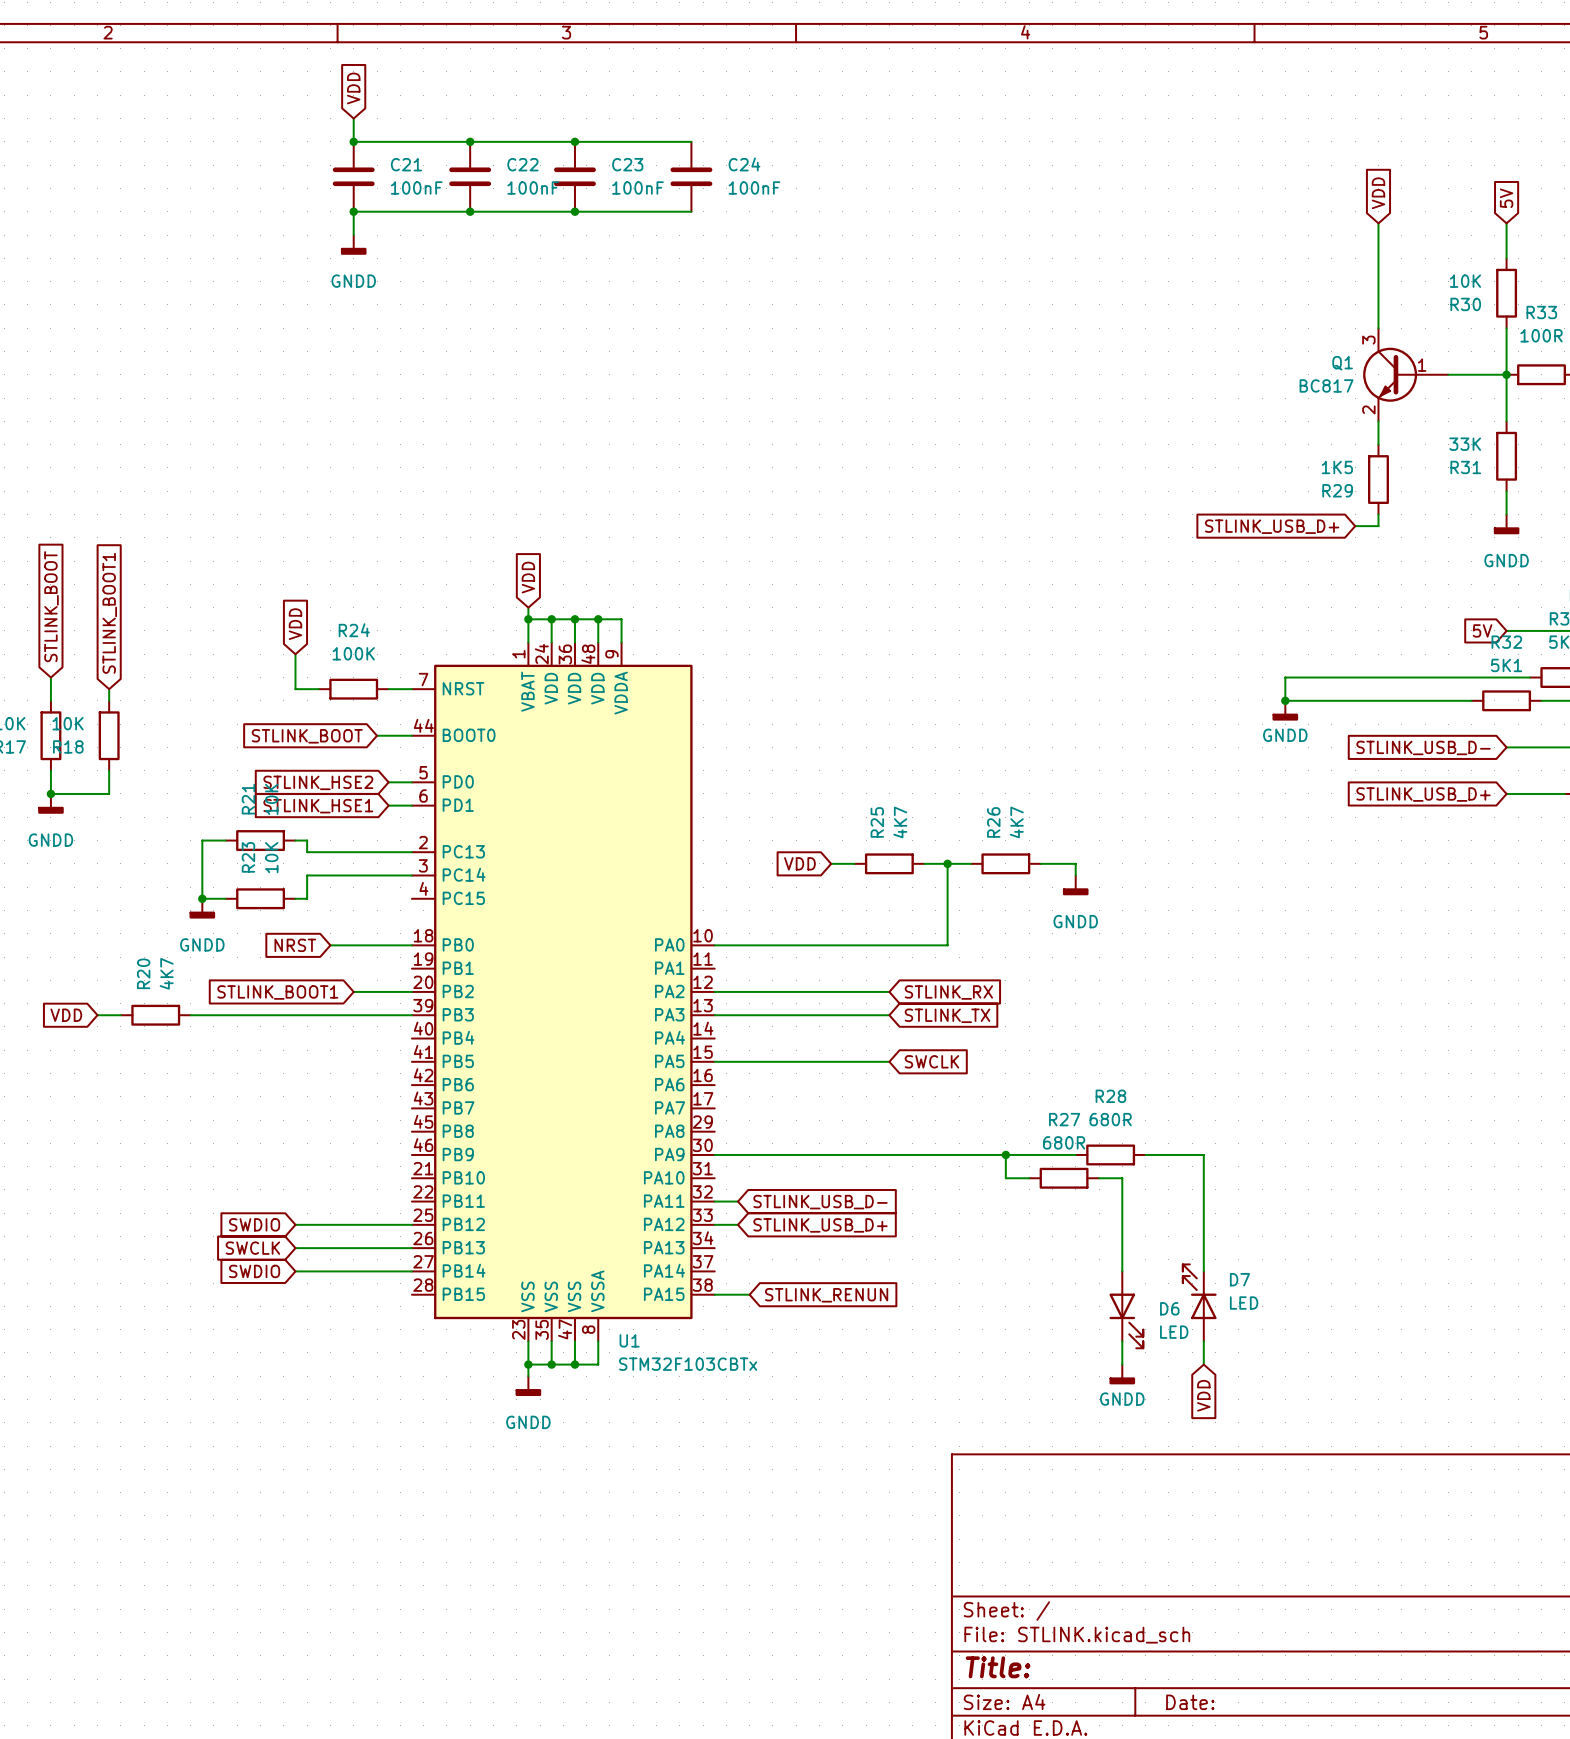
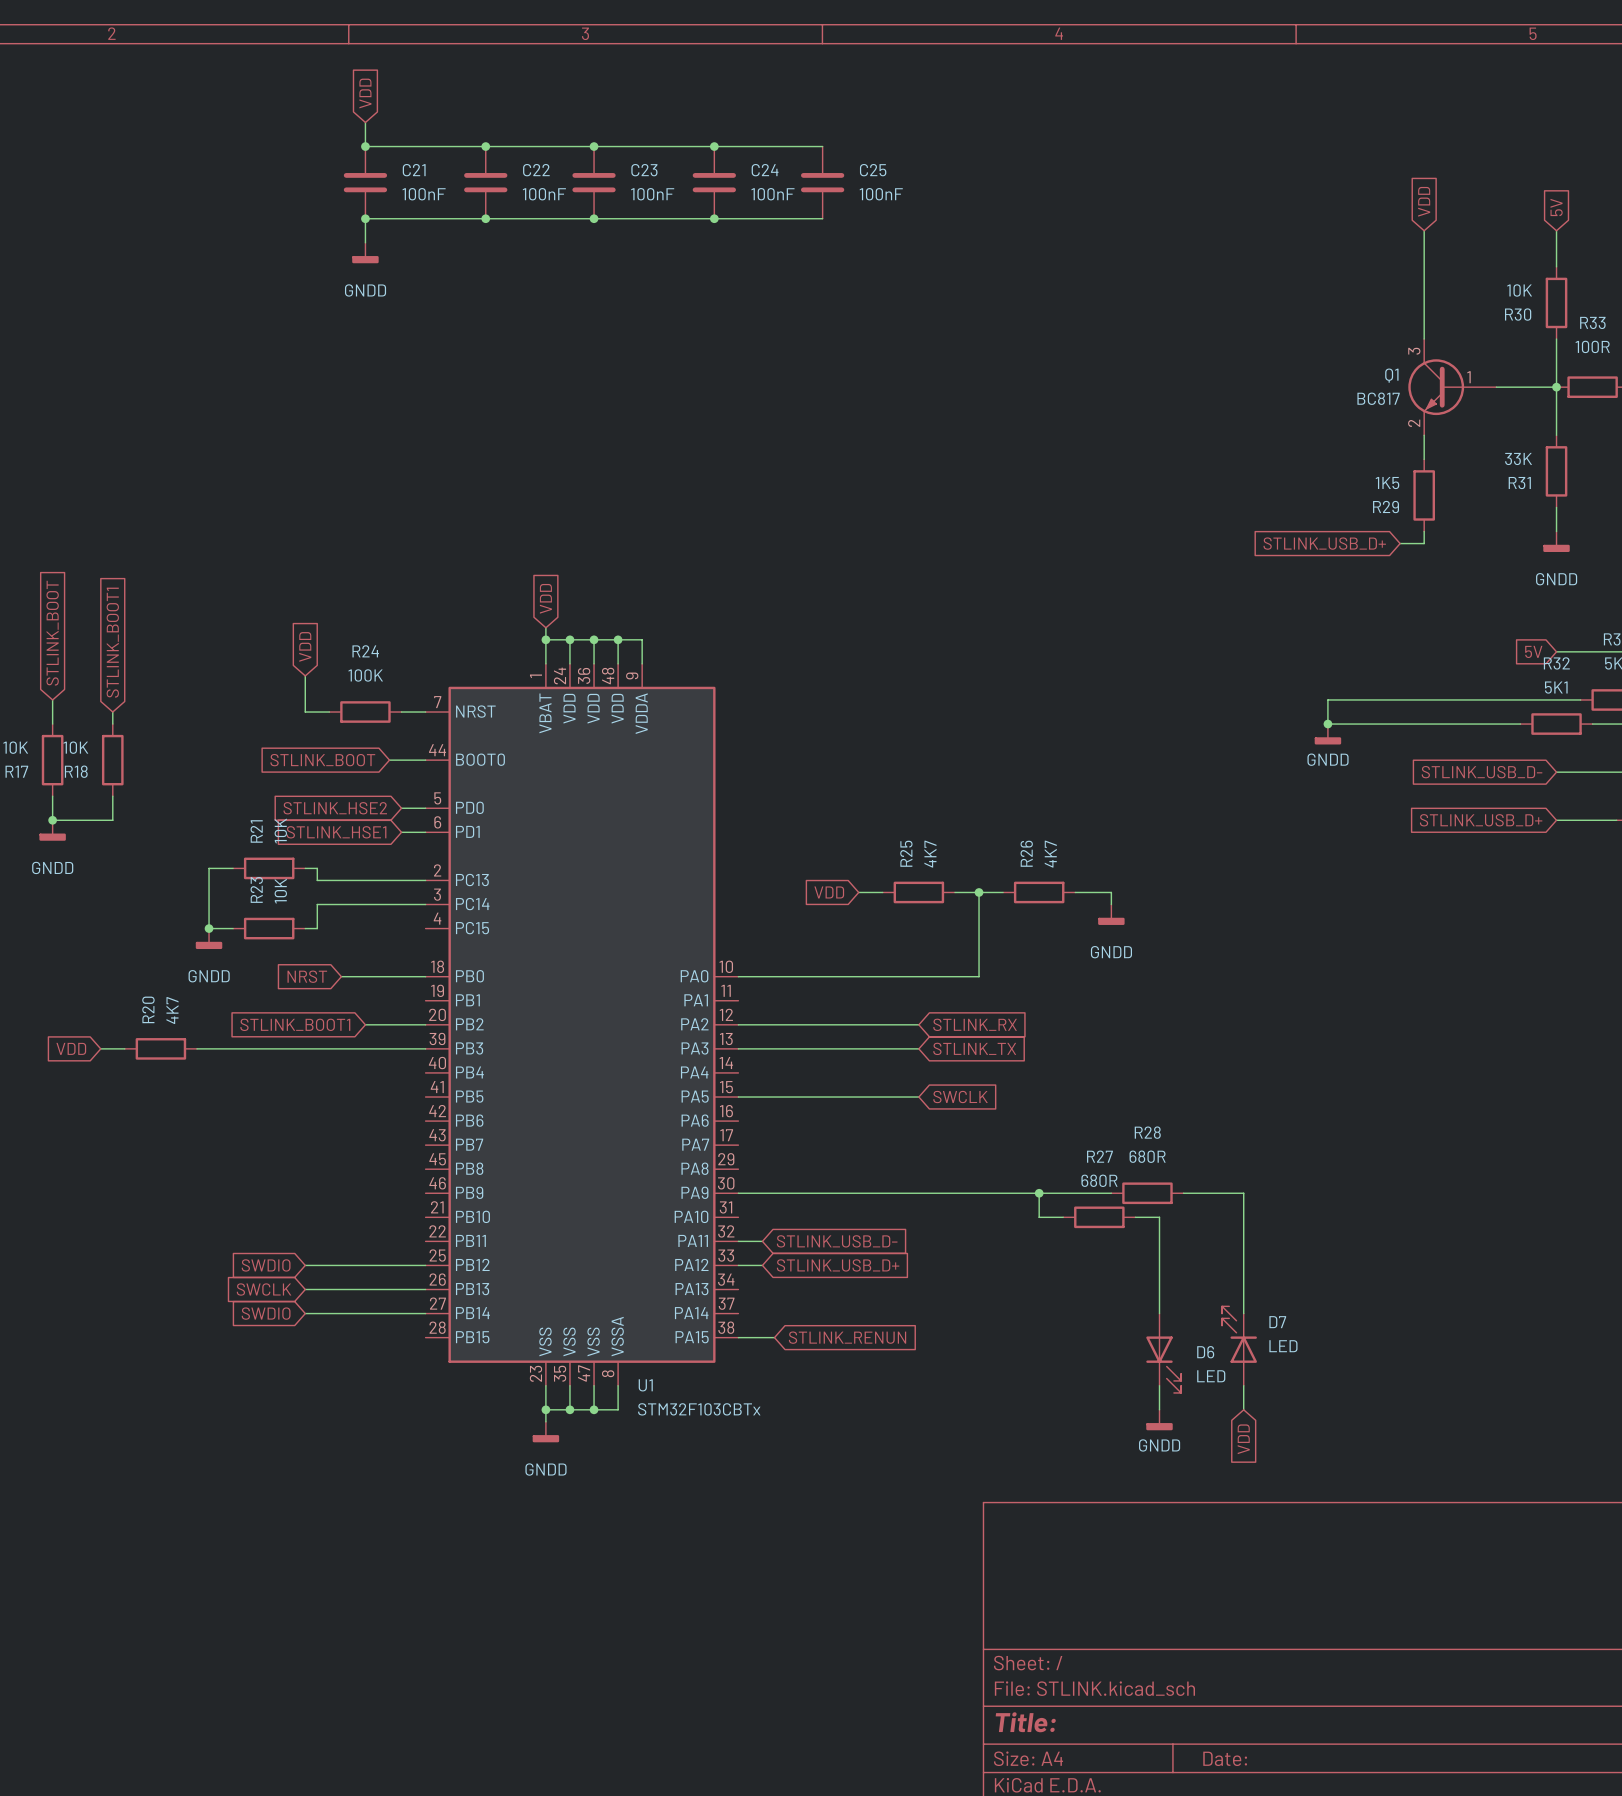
wire: none -> (714, 146) (822, 146)
junction: none -> (714, 146)
C25: none -> 100nF (822, 182)
wire: none -> (714, 218) (822, 218)
junction: none -> (714, 218)

